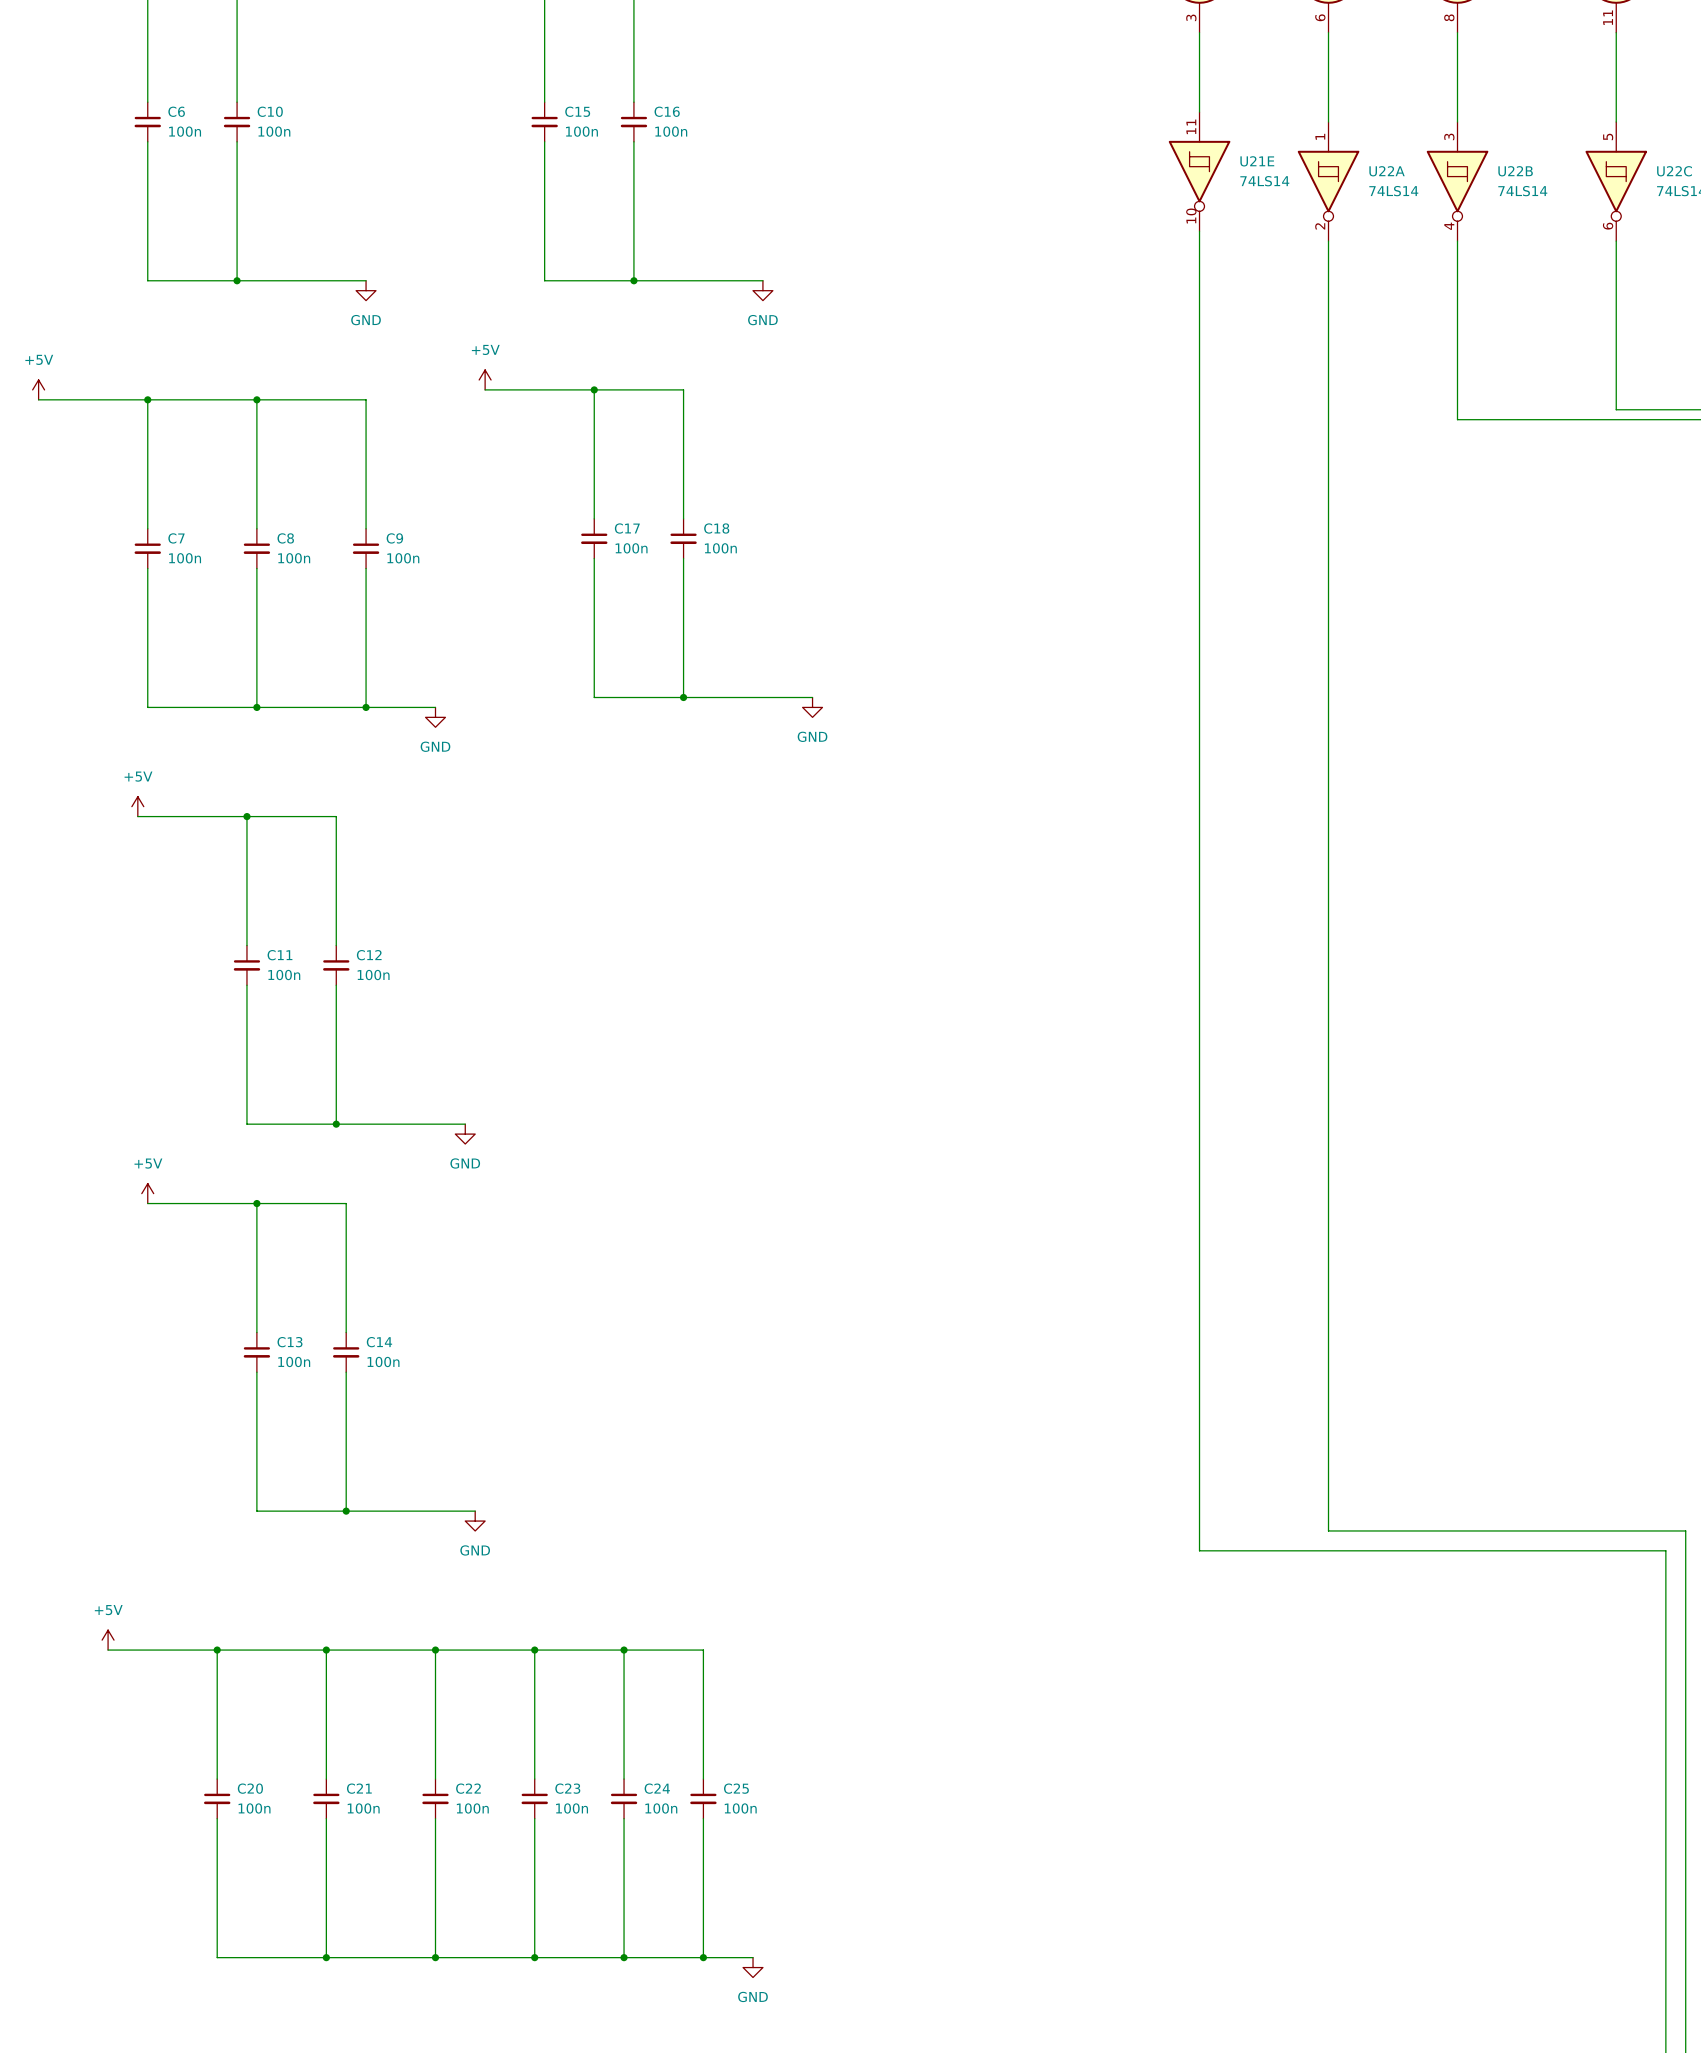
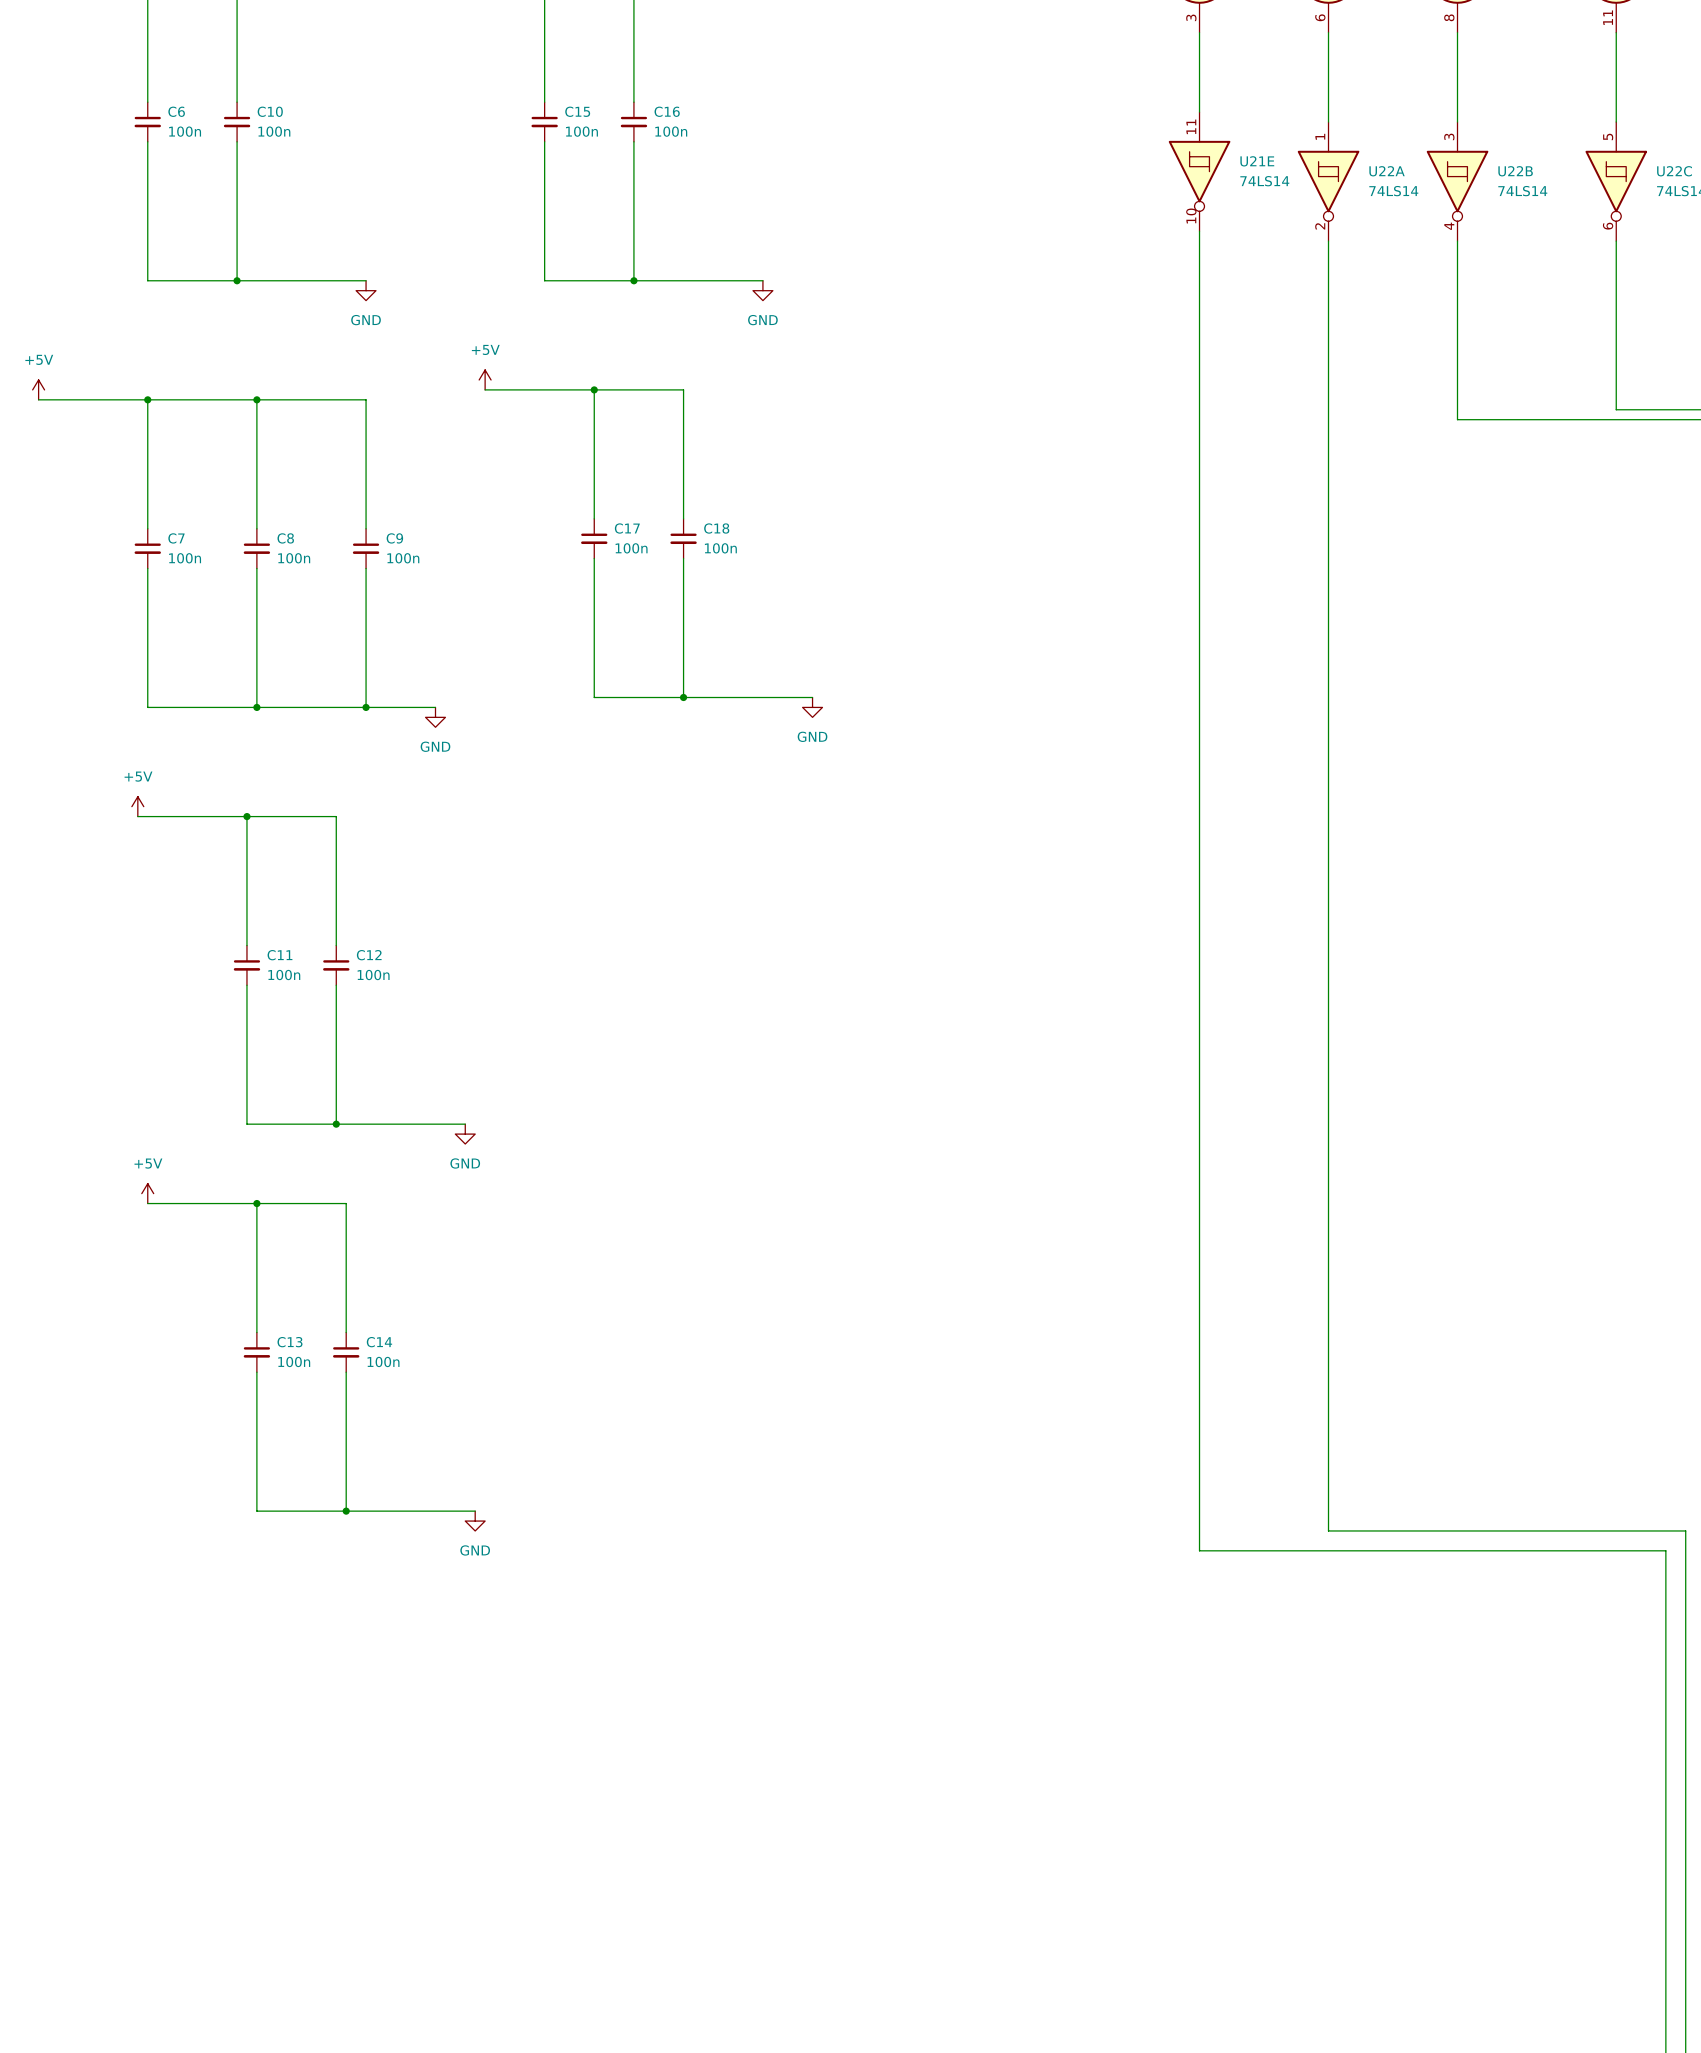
power symbol: +5V (108, 1640) -> none
wire: (108, 1650) (703, 1650) (703, 1779) -> none
wire: (217, 1650) (217, 1779) -> none
junction: (217, 1650) -> none
wire: (326, 1650) (326, 1779) -> none
junction: (326, 1650) -> none
wire: (435, 1650) (435, 1779) -> none
junction: (435, 1650) -> none
wire: (534, 1650) (534, 1779) -> none
junction: (534, 1650) -> none
wire: (624, 1650) (624, 1779) -> none
junction: (624, 1650) -> none
C20: 100n (217, 1798) -> none
C21: 100n (326, 1798) -> none
C22: 100n (435, 1798) -> none
C23: 100n (534, 1798) -> none
C24: 100n (624, 1798) -> none
C25: 100n (703, 1798) -> none
wire: (217, 1818) (217, 1957) (753, 1957) -> none
wire: (326, 1818) (326, 1957) -> none
wire: (435, 1818) (435, 1957) -> none
wire: (534, 1818) (534, 1957) -> none
wire: (624, 1818) (624, 1957) -> none
wire: (703, 1818) (703, 1957) -> none
junction: (326, 1957) -> none
junction: (435, 1957) -> none
junction: (534, 1957) -> none
junction: (624, 1957) -> none
junction: (703, 1957) -> none
power symbol: GND (753, 1967) -> none

